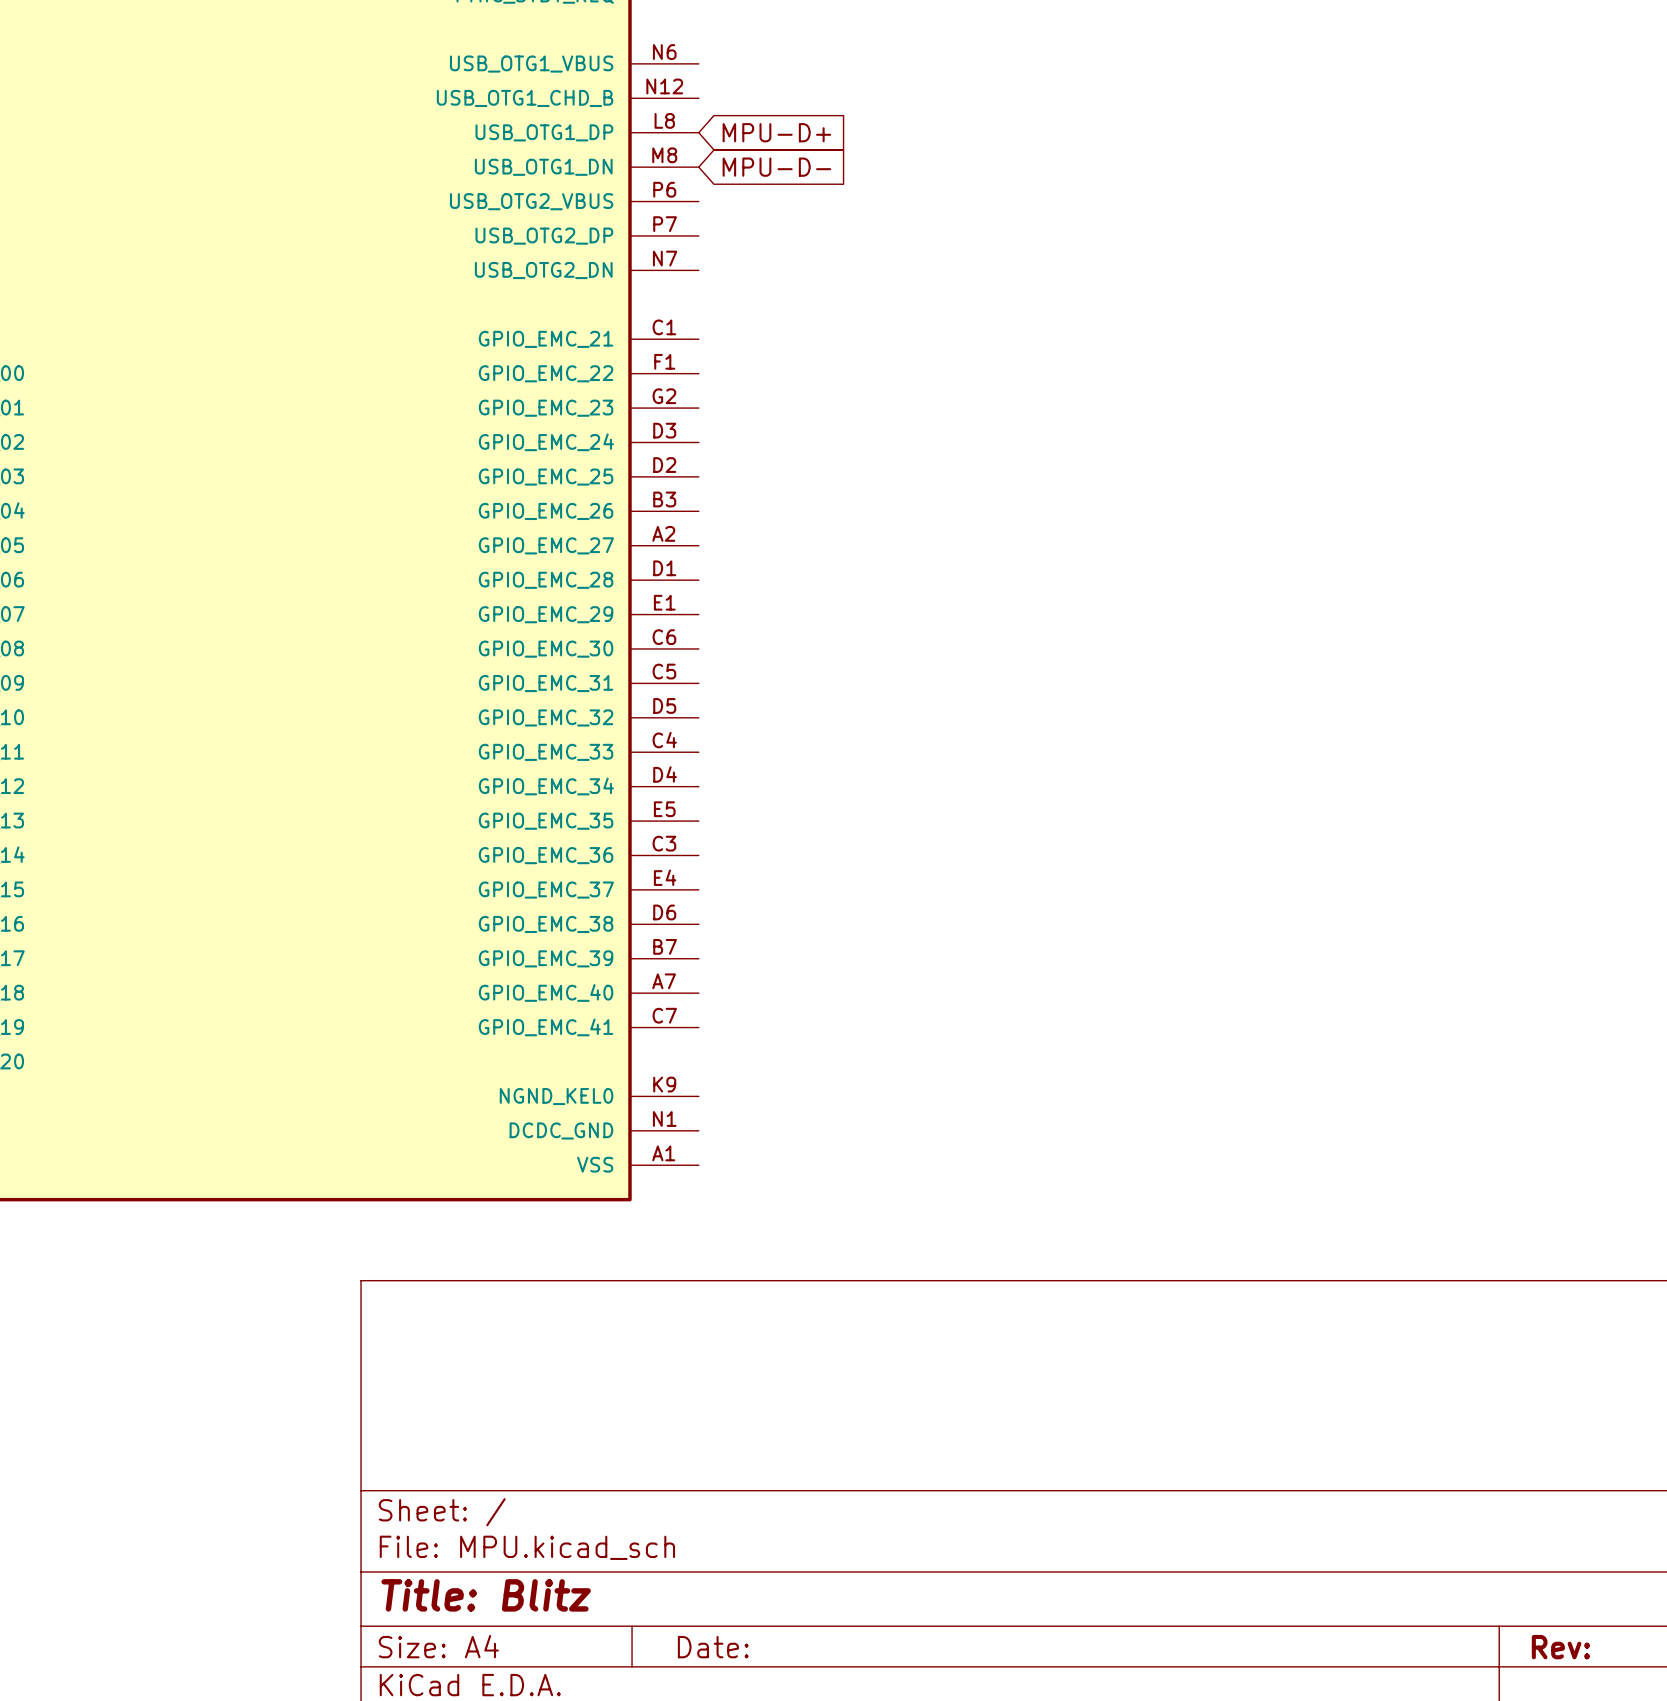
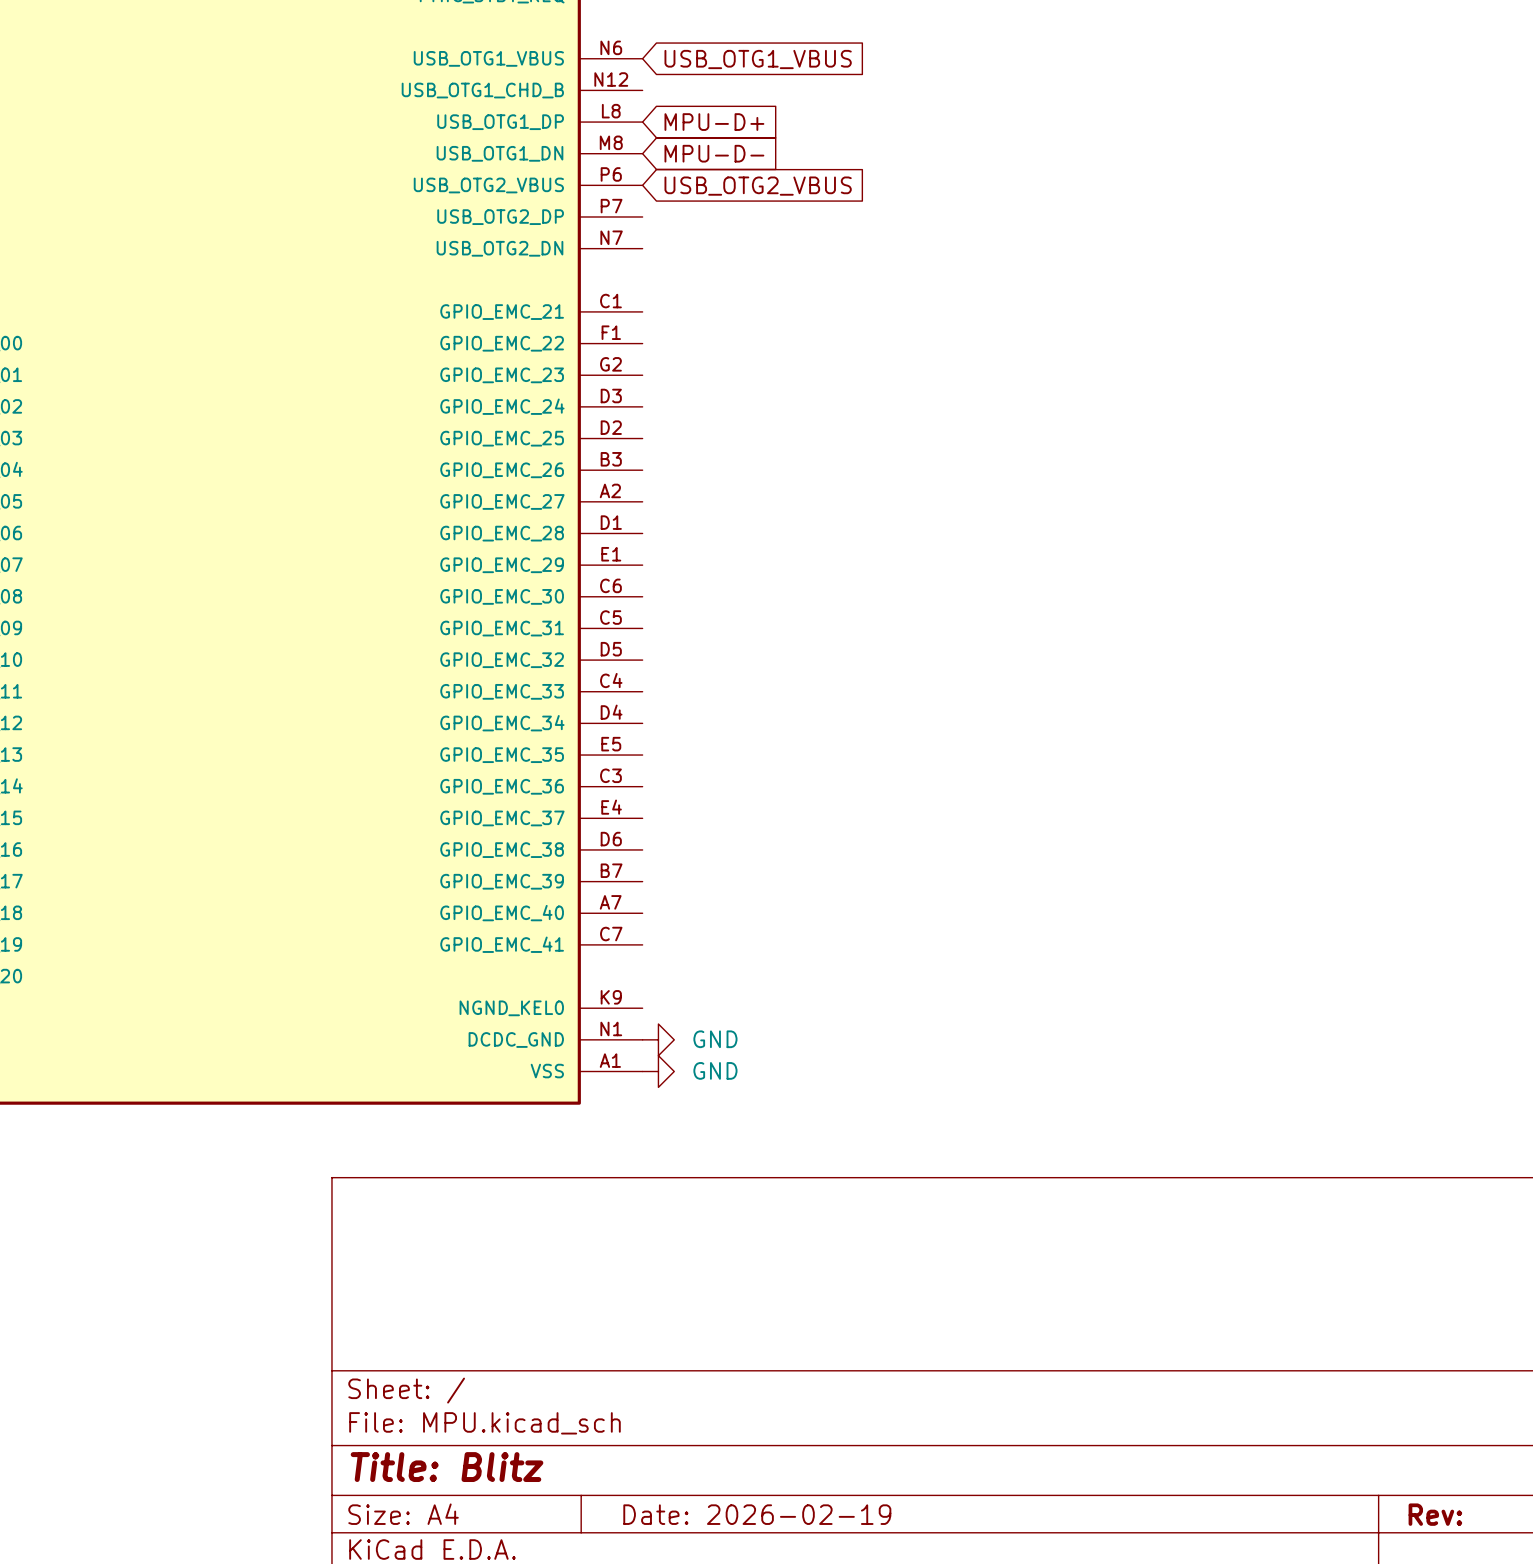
global label: none -> USB_OTG1_VBUS (758, 59)
global label: none -> USB_OTG2_VBUS (758, 186)
power symbol: none -> GND (658, 1039)
power symbol: none -> GND (658, 1071)
title block: Date: (713, 1647) -> Date: 2026-02-19 (757, 1514)

